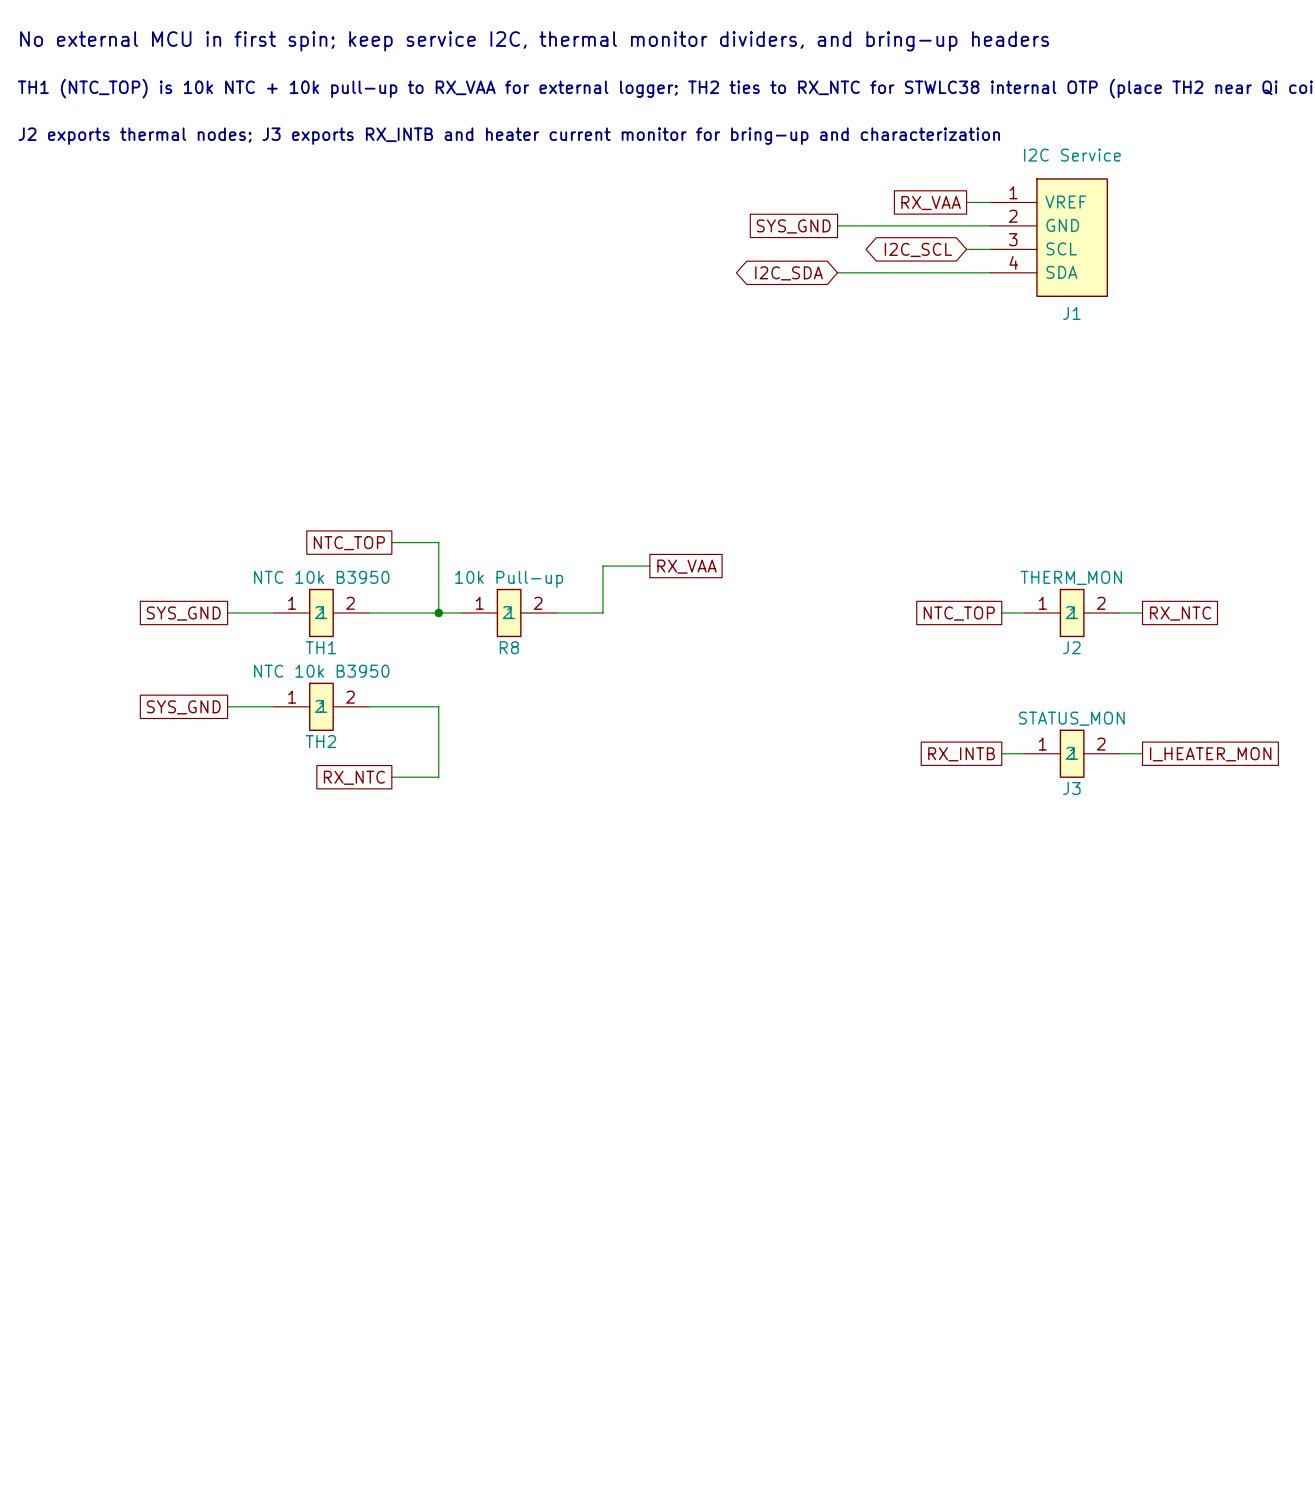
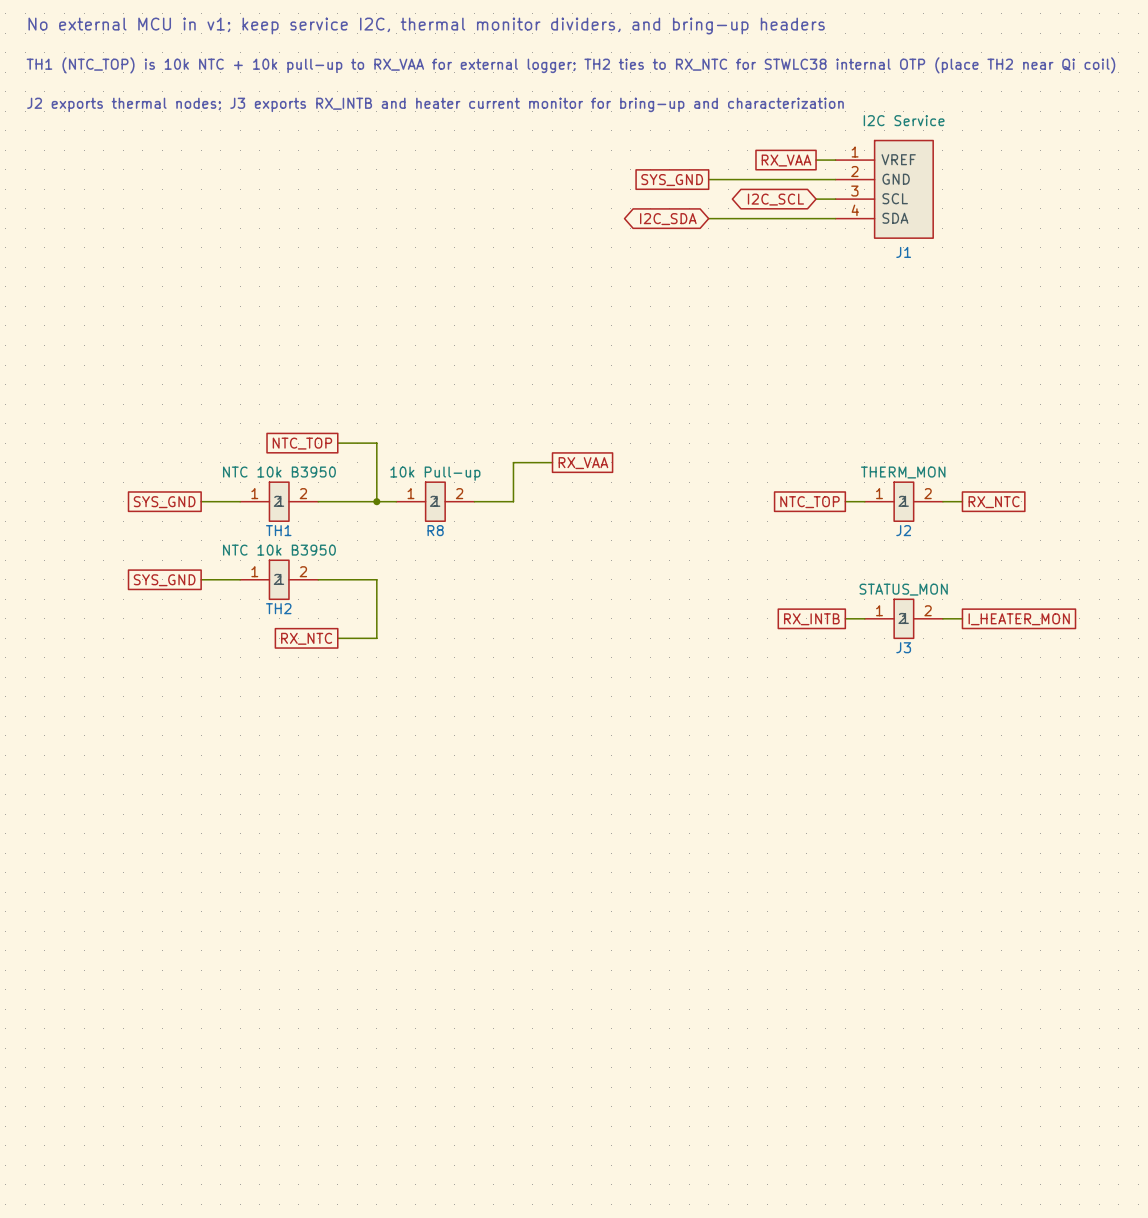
text: No external MCU in first spin; keep service I2C, thermal monitor dividers, and bring-up headers (534, 41) -> No external MCU in v1; keep service I2C, thermal monitor dividers, and bring-up headers (426, 26)

